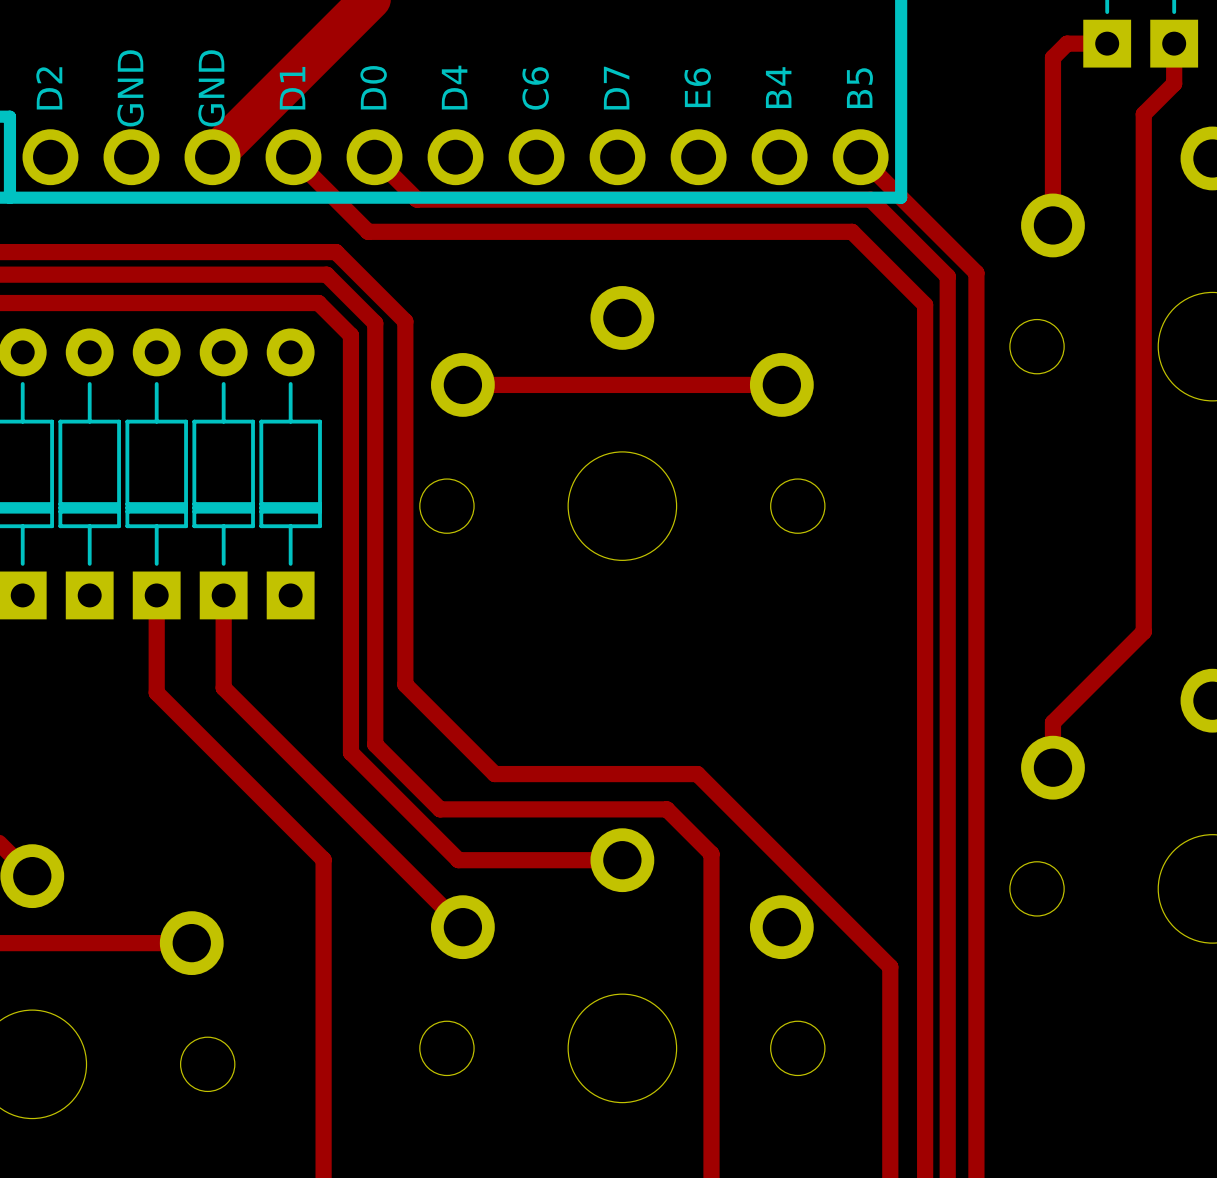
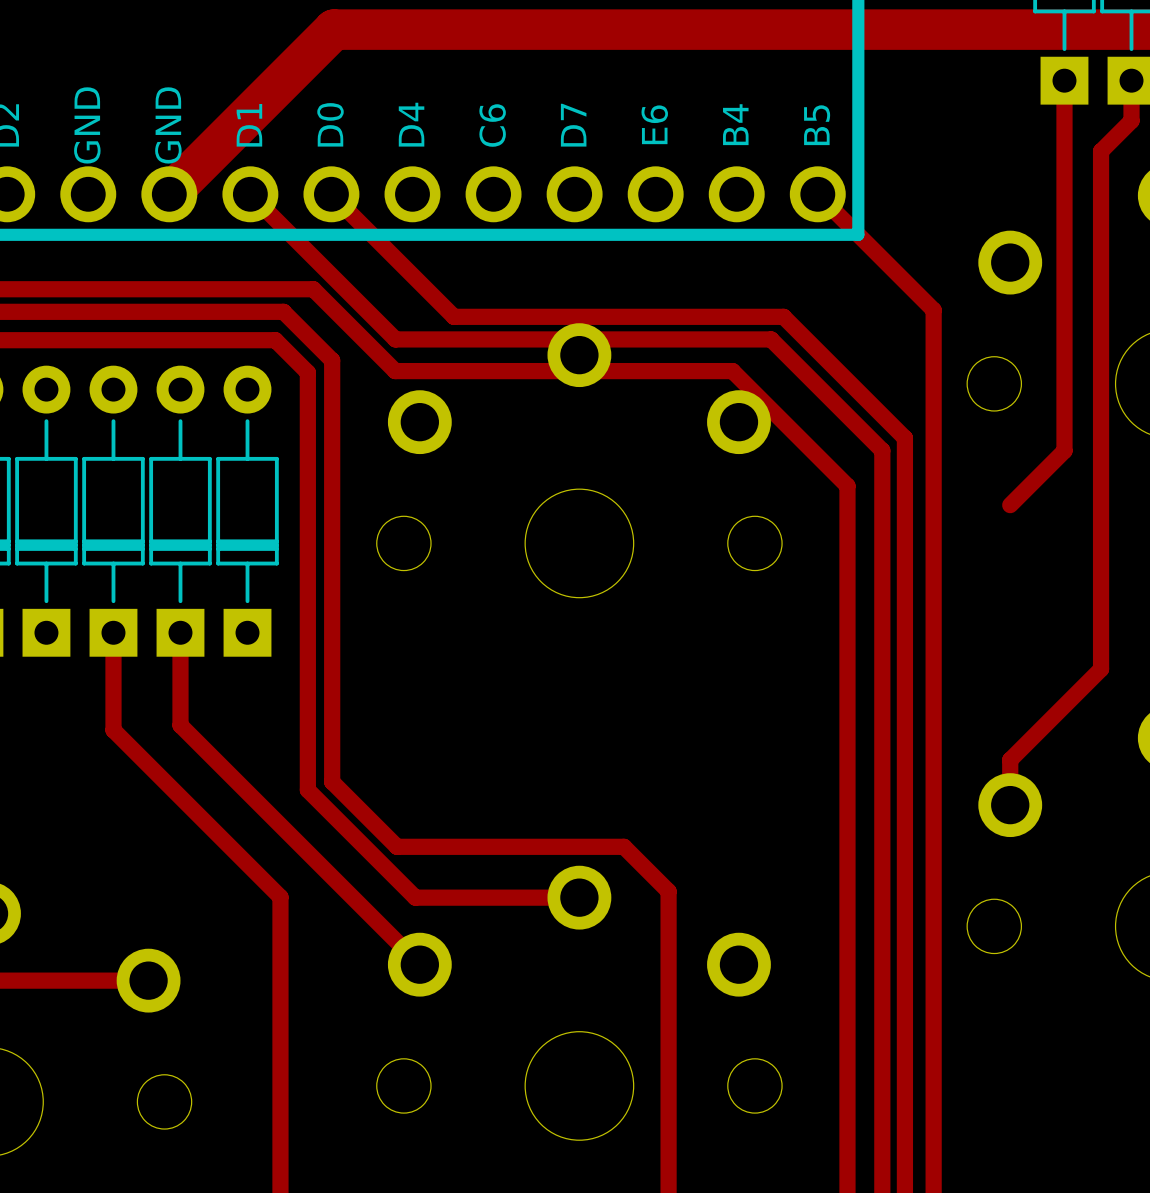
track: (1107, 43) (1067, 43) (1052, 57) (1052, 225) -> (1064, 80) (1064, 450) (1010, 505)
track: (416, 199) (870, 199) (947, 276) (947, 400) -> (373, 236) (453, 316) (783, 316) (904, 438)
track: (368, 231) (852, 231) (925, 304) (925, 413) -> (325, 268) (395, 339) (771, 339) (882, 450)
track: (336, 252) (405, 321) (405, 684) (494, 774) (697, 774) (890, 966) -> (292, 289) (313, 289) (395, 371) (732, 371) (847, 485) (847, 1004)
track: (462, 384) (781, 384) -> none

